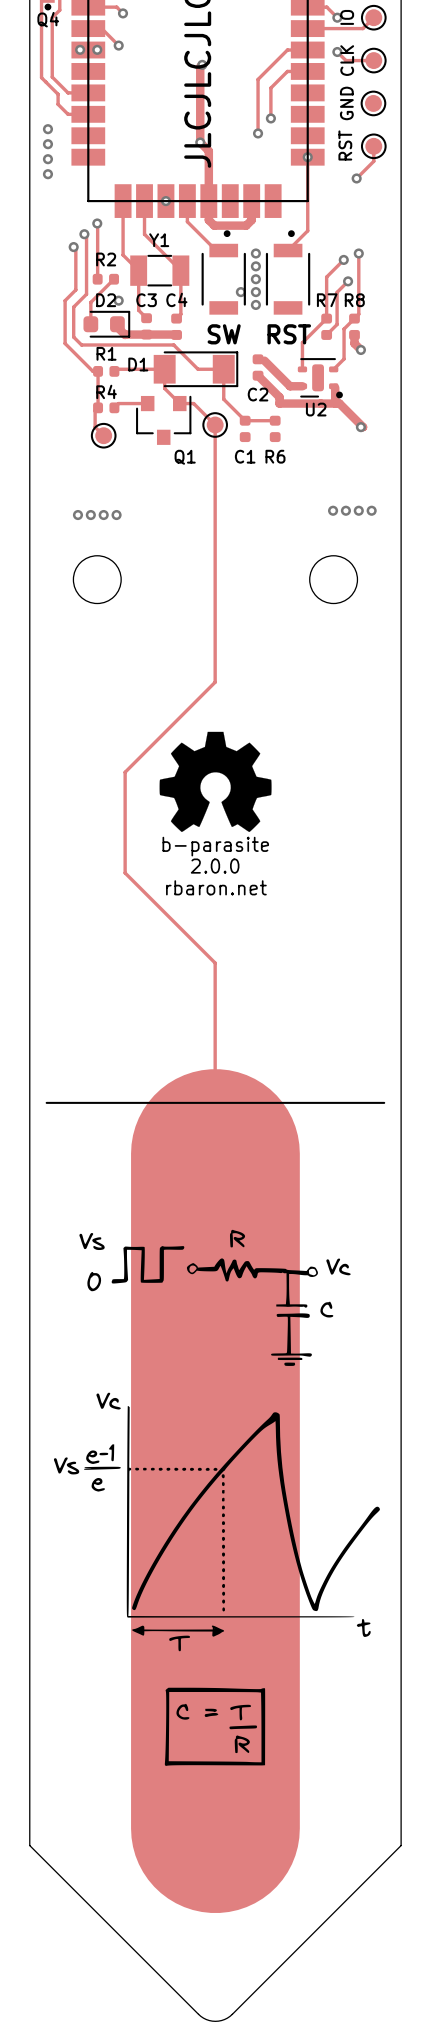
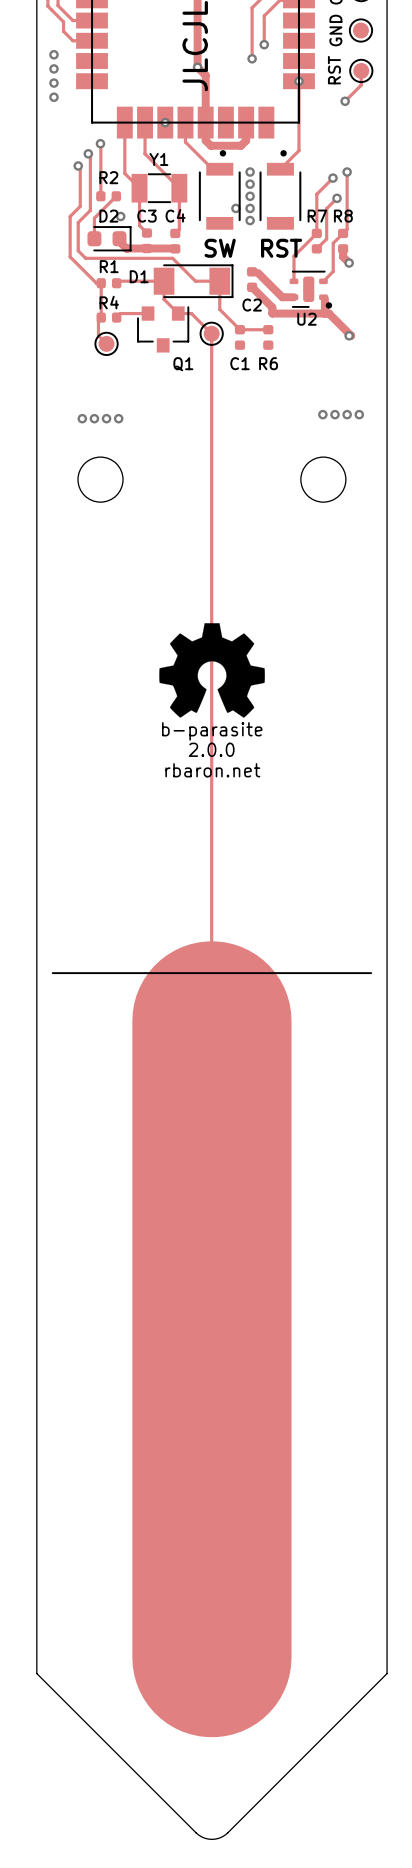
track: (215, 682) (125, 772) (125, 873) (215, 963) -> (211, 576) (211, 841)
drawing: [53, 1229, 380, 1766] -> none

